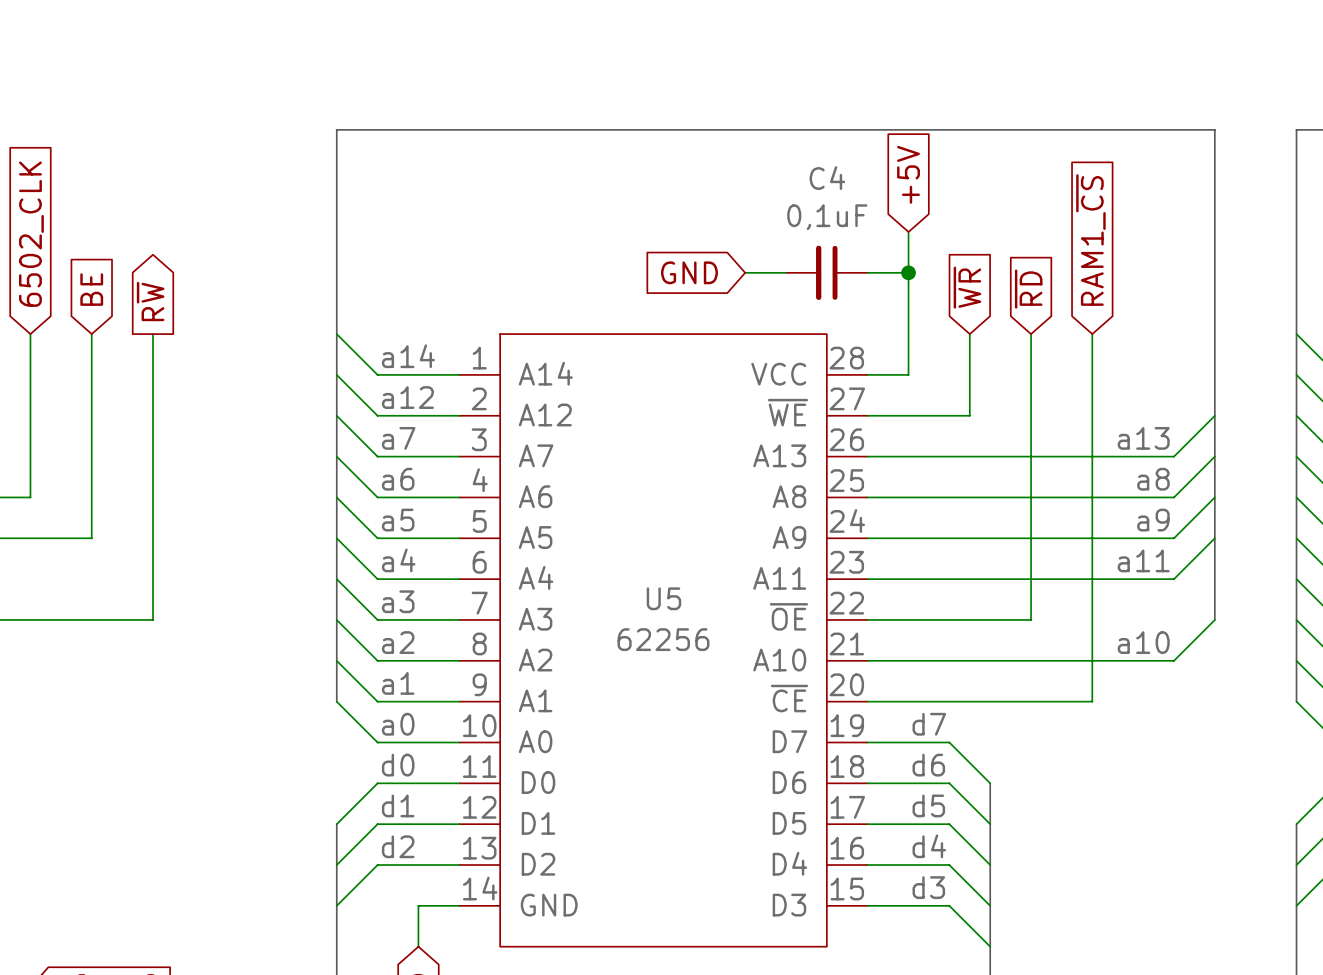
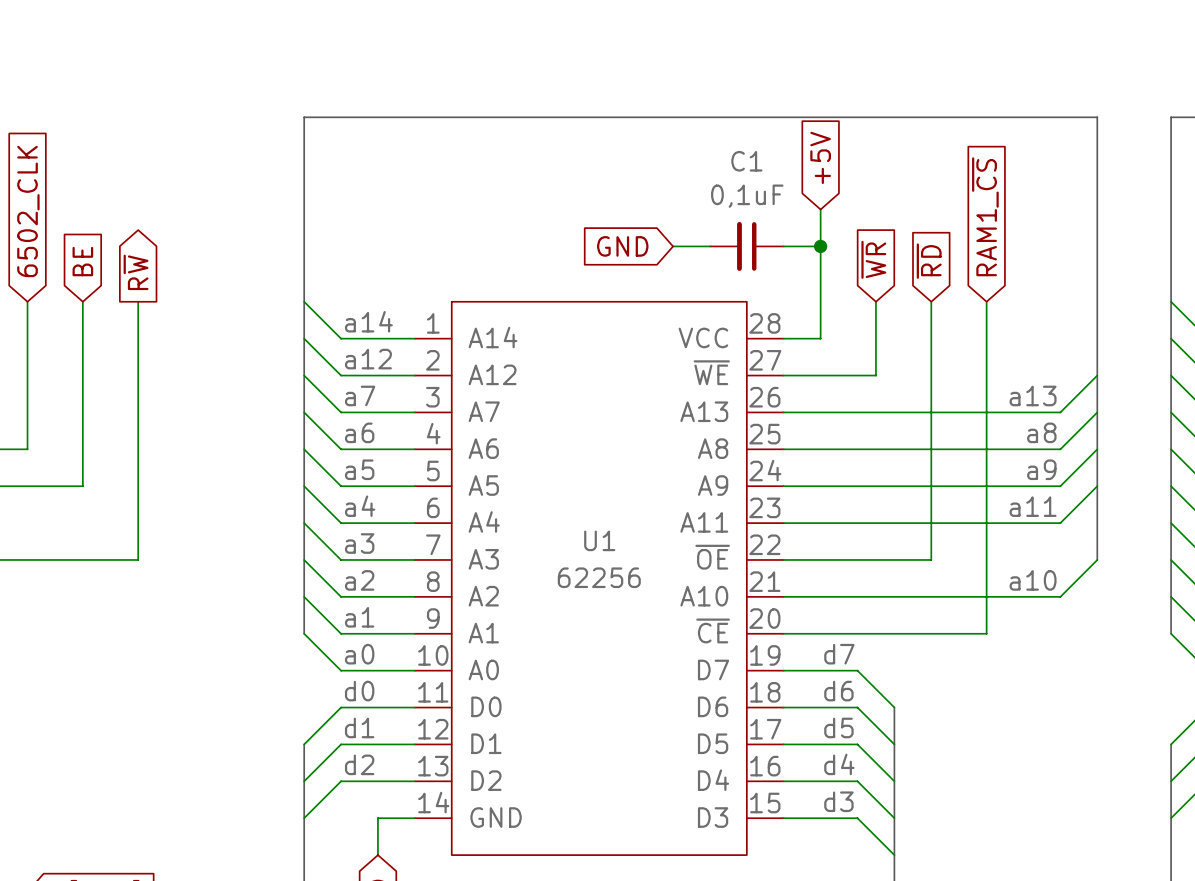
C4 name: C4 (827, 178) -> C1 (746, 161)
U5 name: U5 (663, 598) -> U1 (599, 540)

